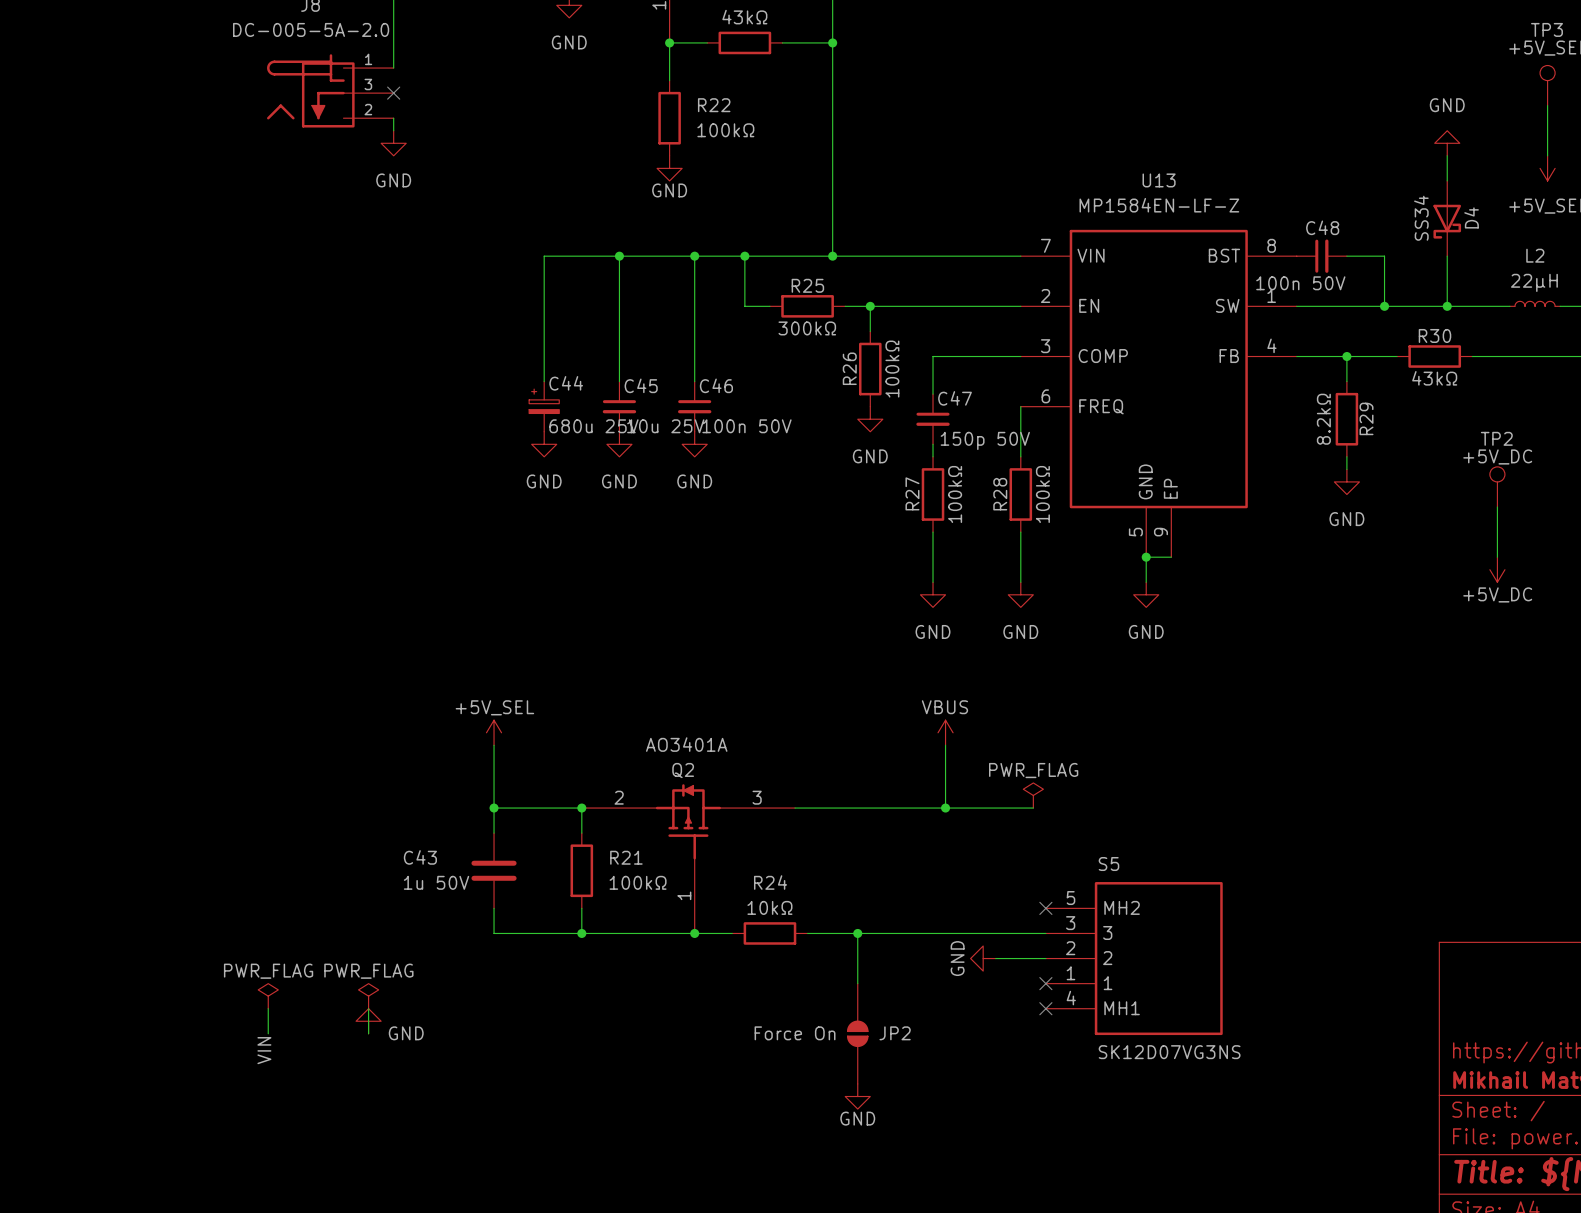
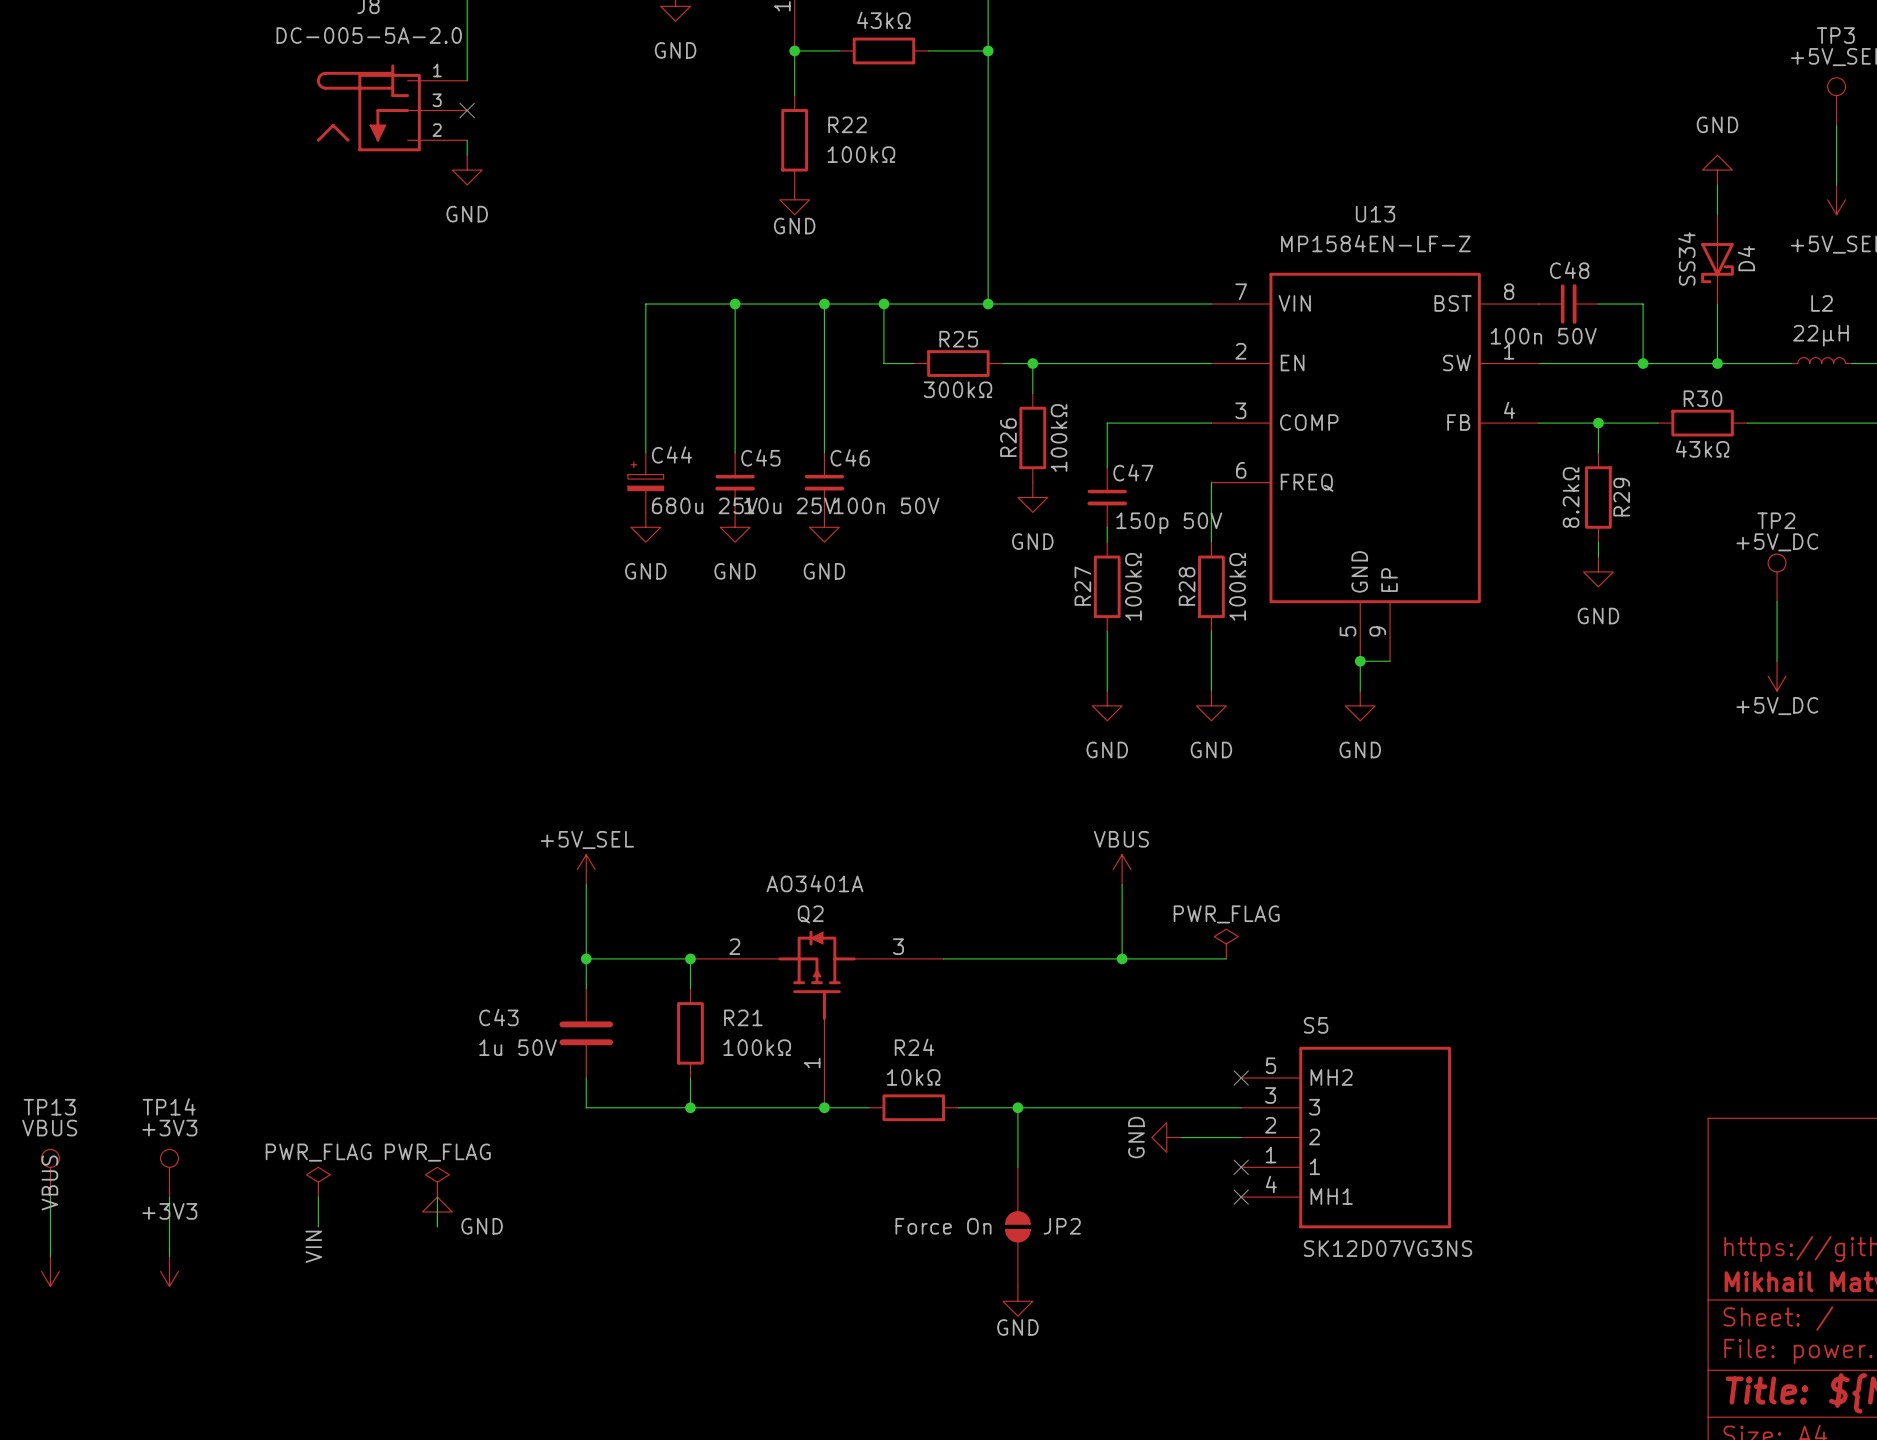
TP13: none -> VBUS (50, 1173)
TP14: none -> +3V3 (169, 1173)
wire: none -> (50, 1197) (50, 1256)
wire: none -> (169, 1197) (169, 1256)
power symbol: none -> VBUS (50, 1271)
power symbol: none -> +3V3 (169, 1271)

